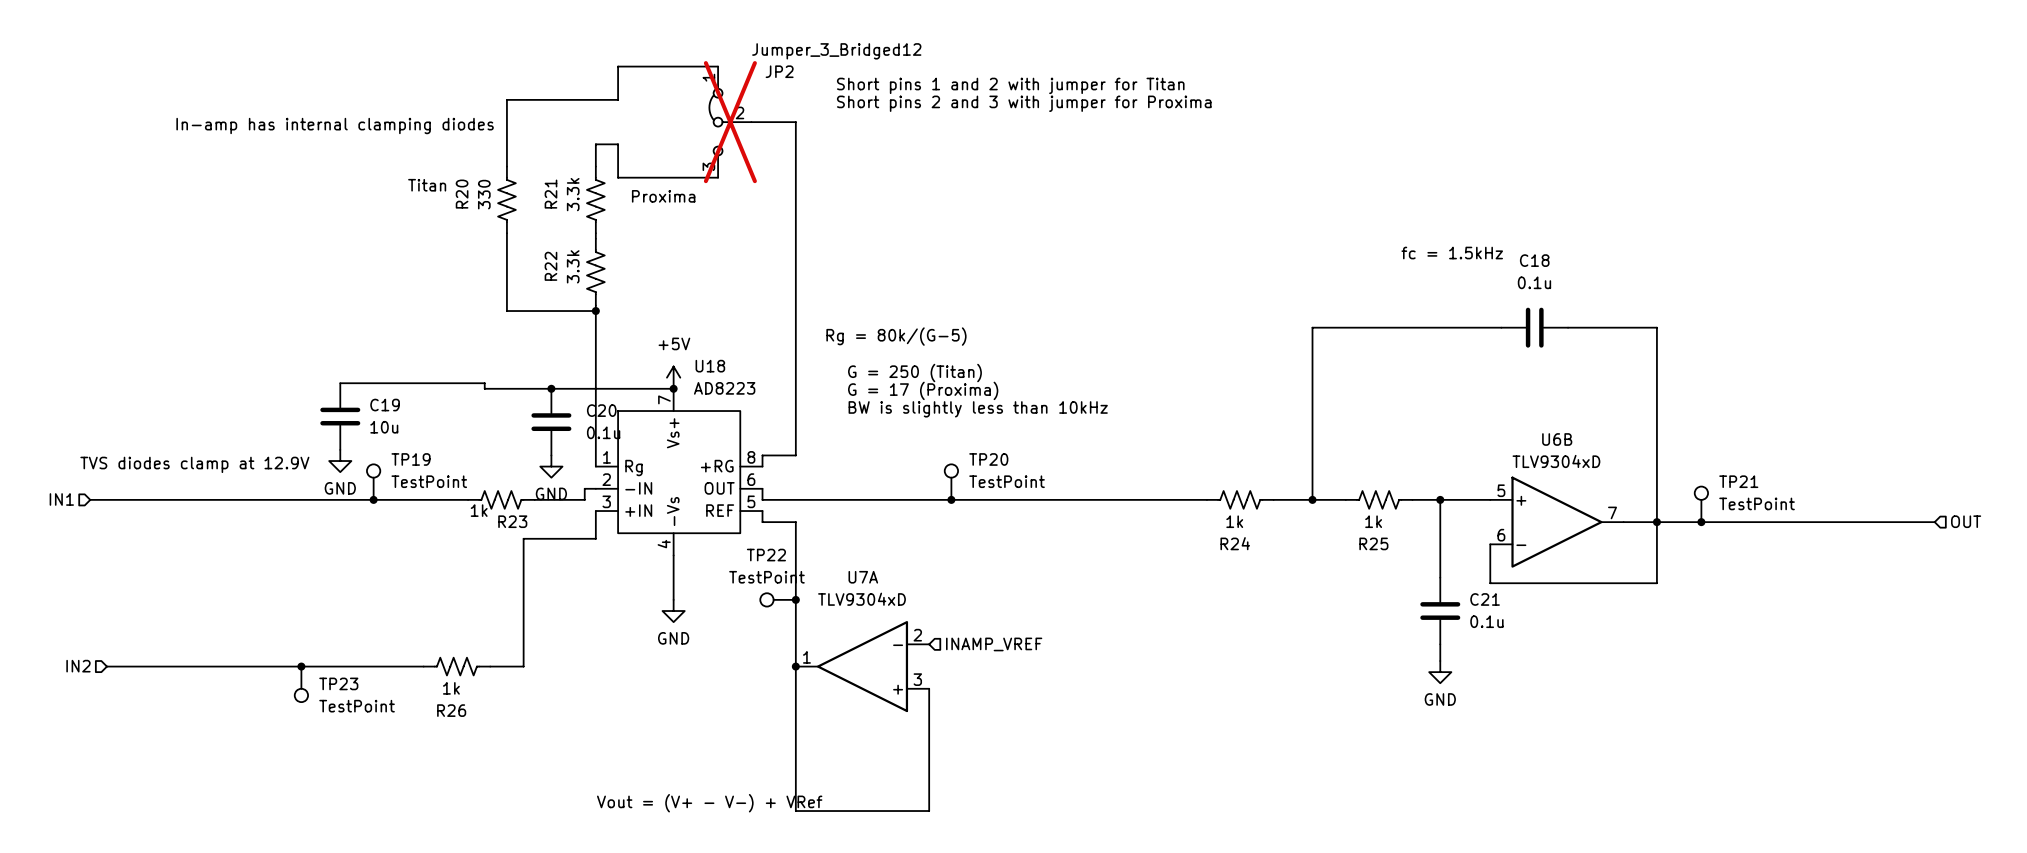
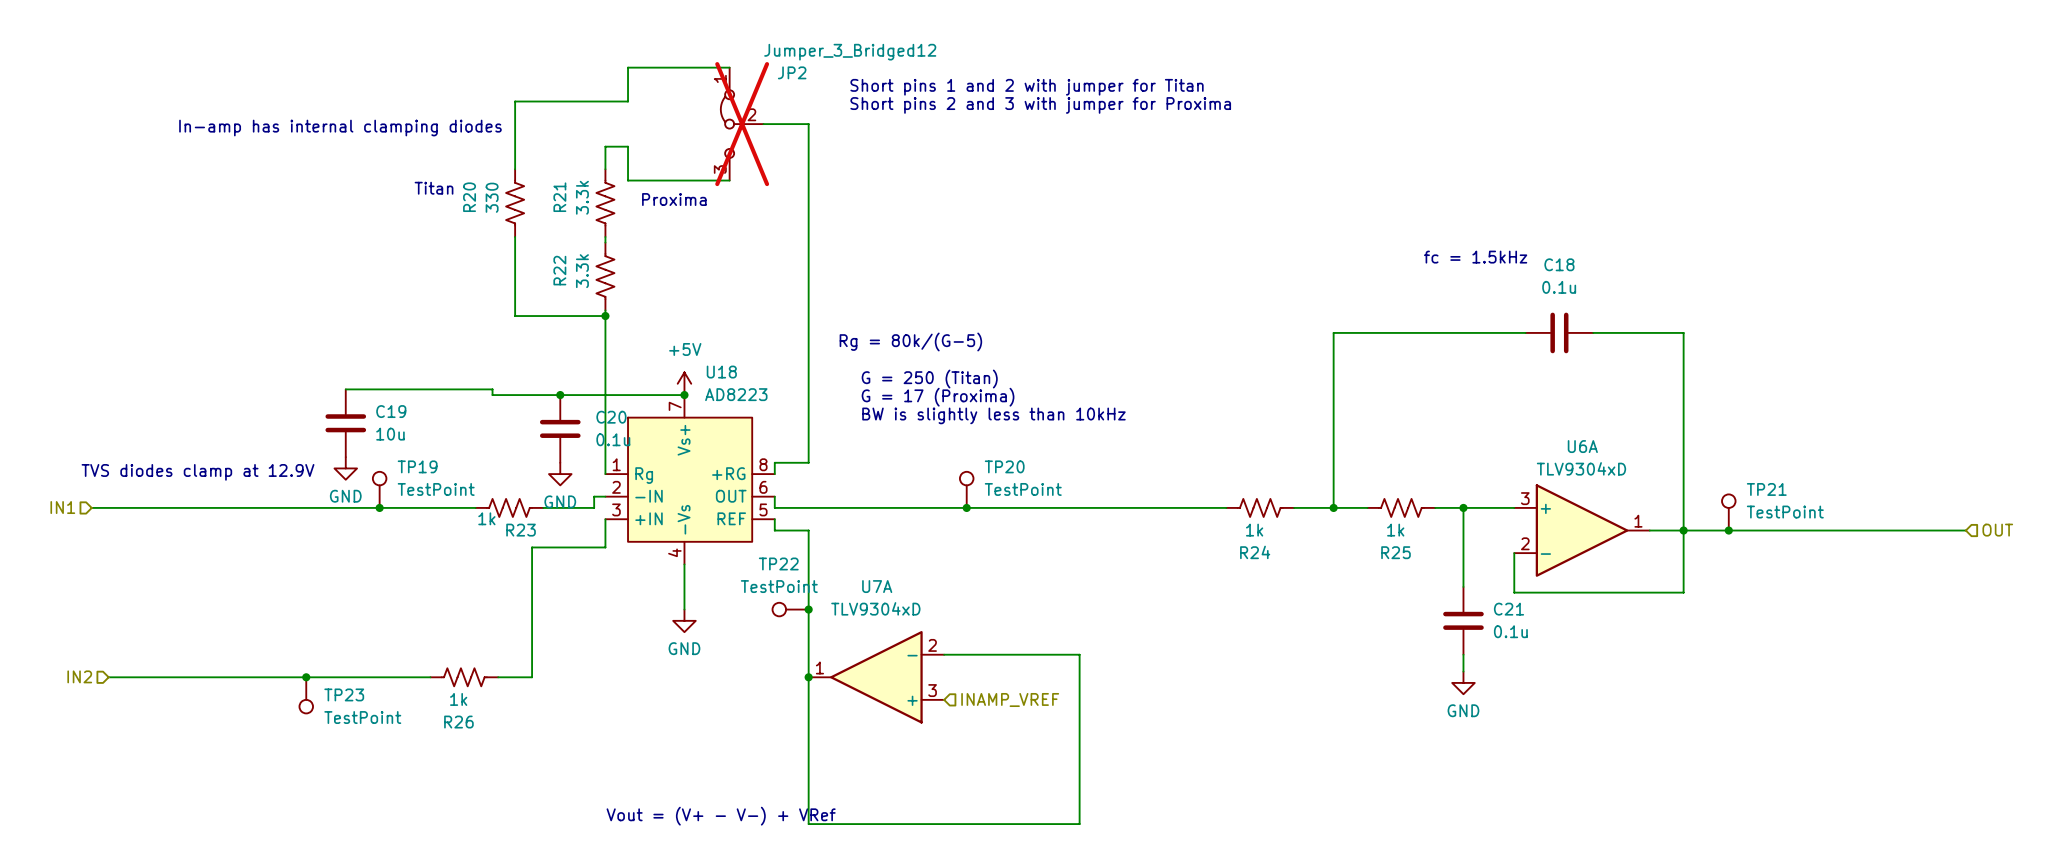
U6B name: U6B (1557, 439) -> U6A (1582, 446)
U6B pin number: 5 (1501, 490) -> 3 (1525, 498)
U6B pin number: 7 (1612, 512) -> 1 (1638, 521)
U6B pin number: 6 (1501, 535) -> 2 (1525, 543)
hierarchical label position: INAMP_VREF (994, 644) -> INAMP_VREF (1010, 699)
wire: (929, 688) (929, 811) -> (944, 654) (1079, 654) (1079, 824) (944, 824)

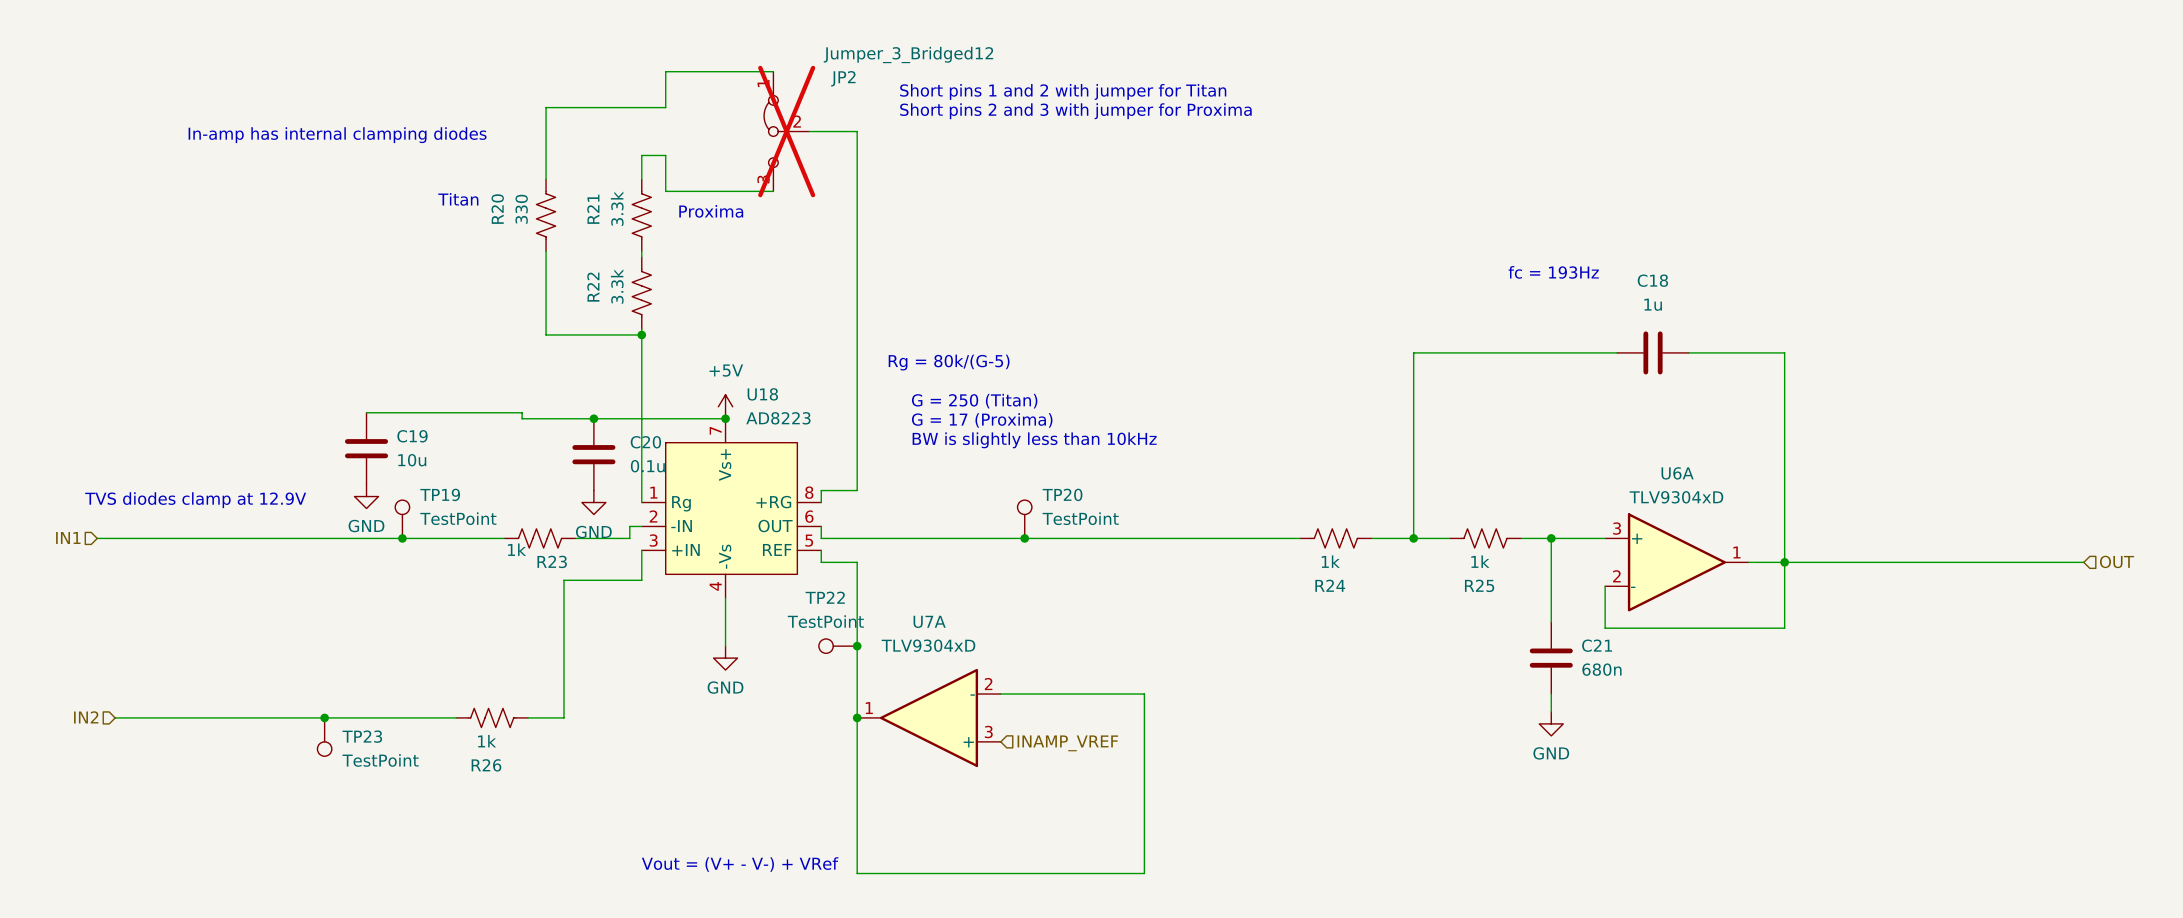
text: fc = 1.5kHz (1475, 257) -> fc = 193Hz (1553, 272)
C18 value: 0.1u (1559, 287) -> 1u (1653, 304)
TP21: TestPoint (1728, 512) -> none
junction: (1728, 530) -> none
C21 value: 0.1u (1510, 631) -> 680n (1601, 669)

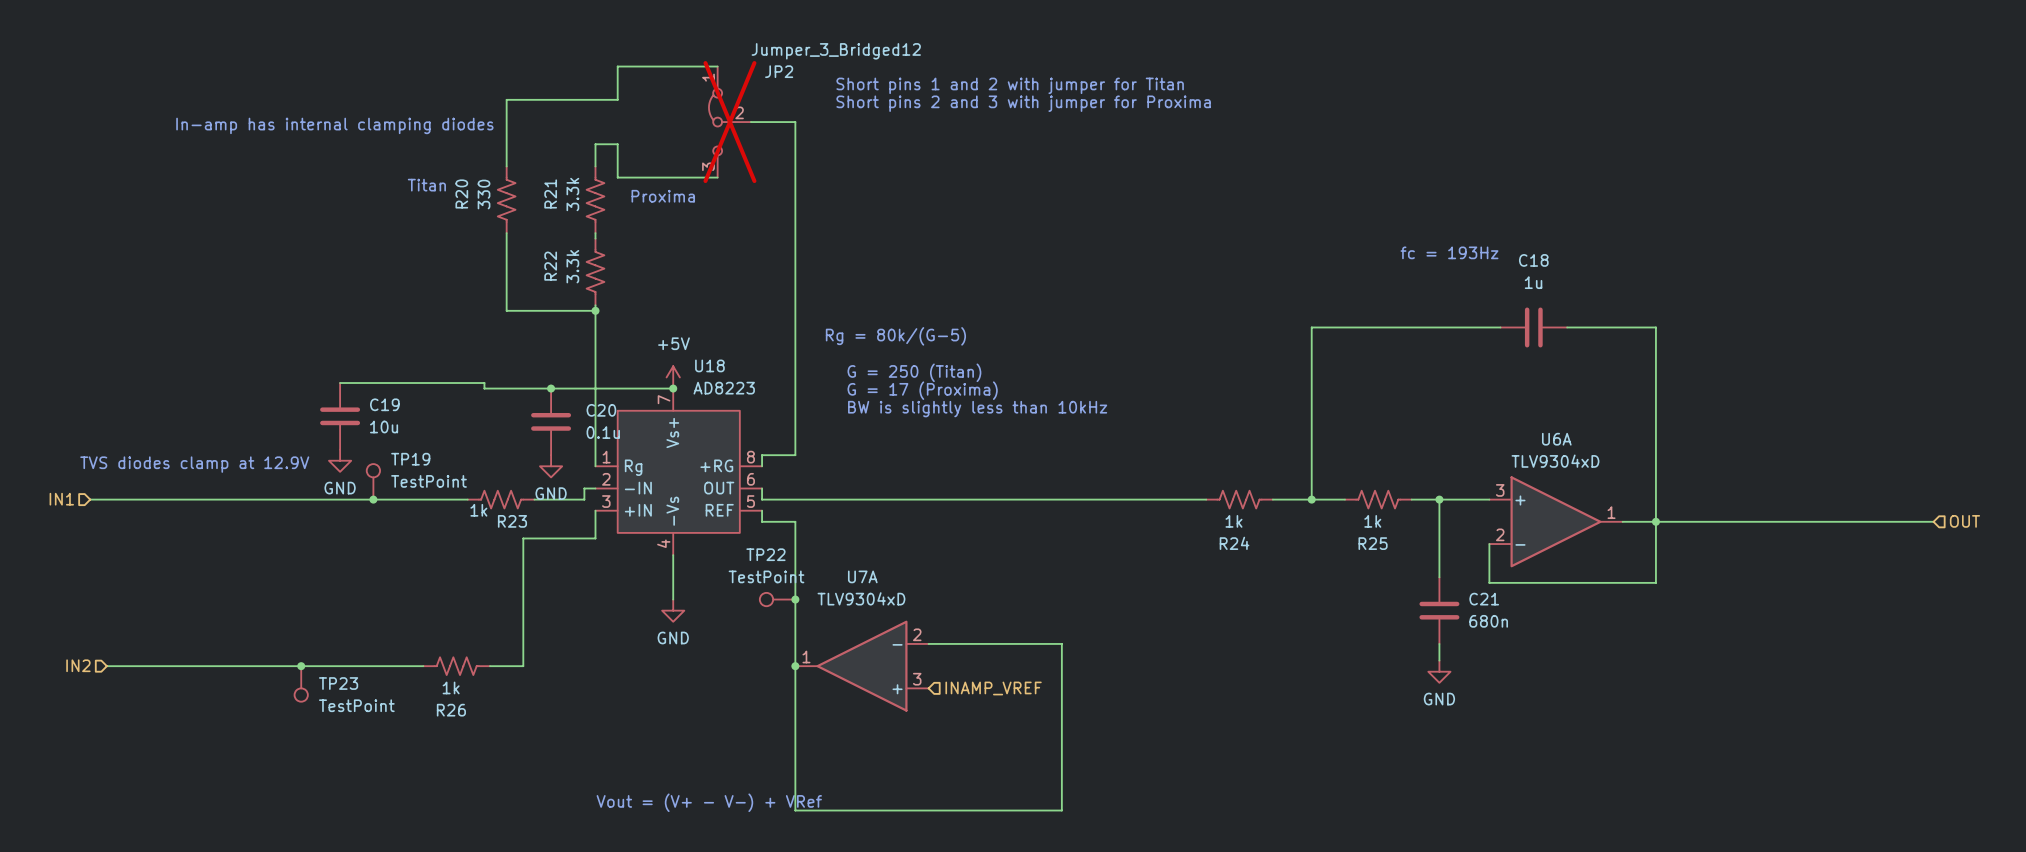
TP20: TestPoint (1024, 519) -> none
junction: (1024, 538) -> none

